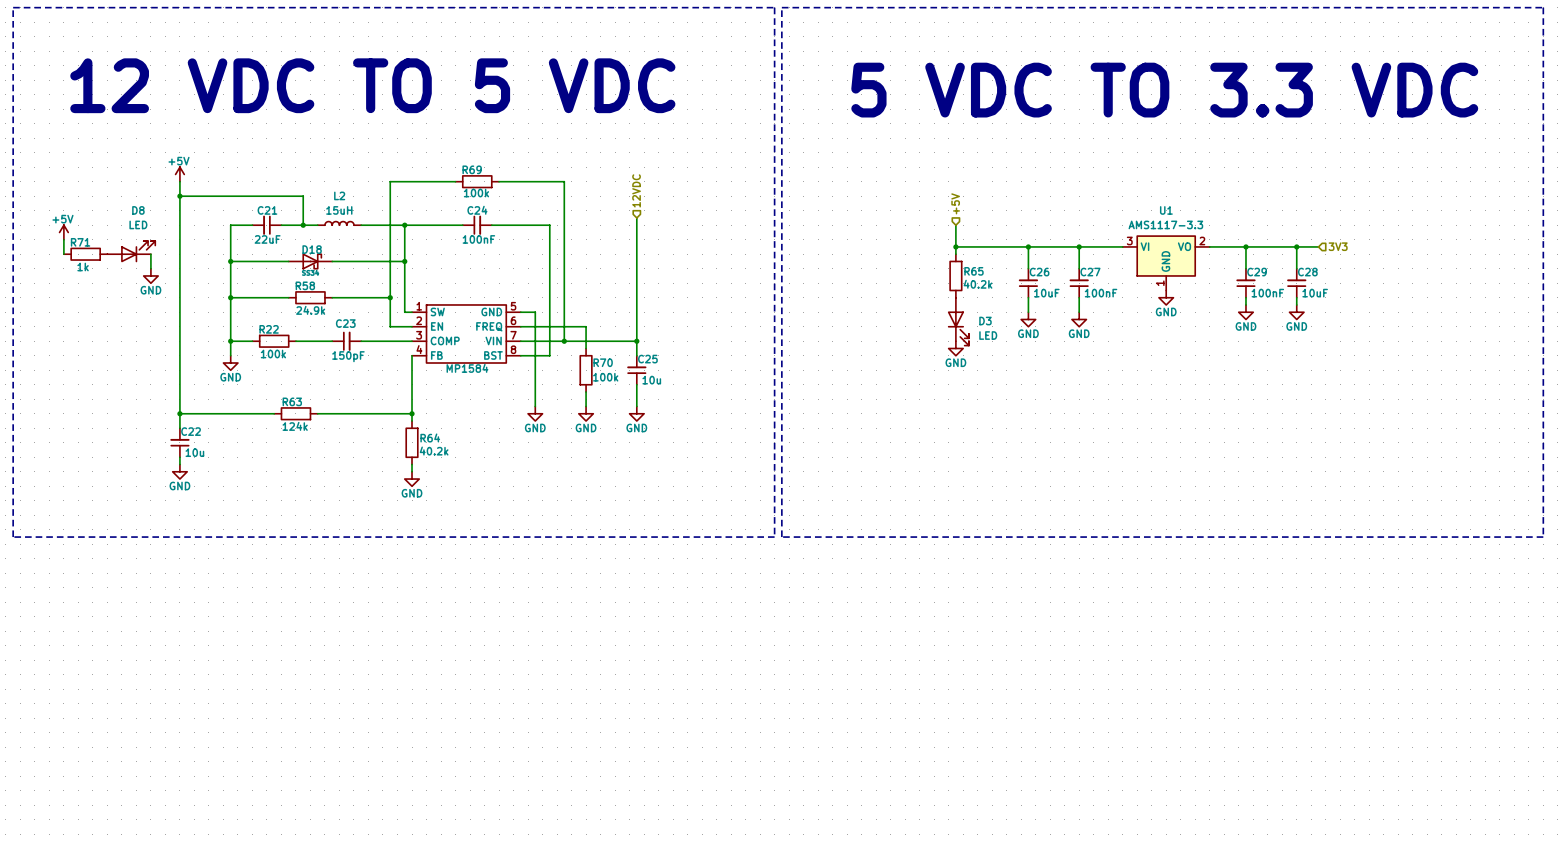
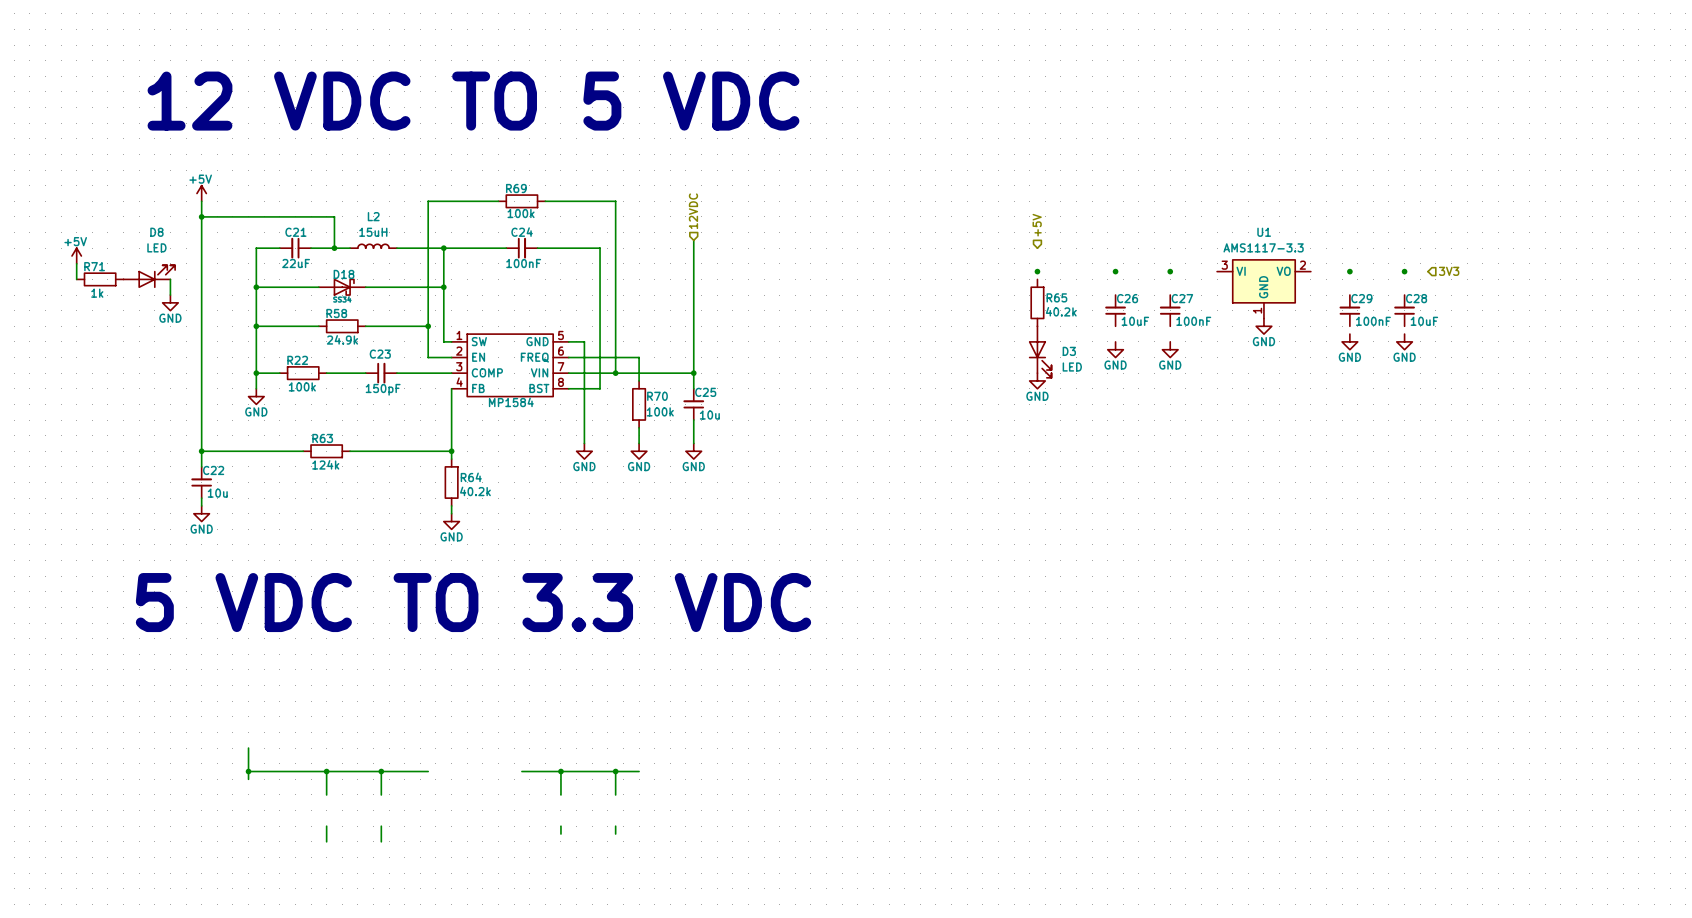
line: (13, 7) (774, 7) (774, 537) (13, 537) (13, 7) -> none
line: (781, 7) (1543, 7) (1543, 537) (781, 537) (781, 7) -> none
text position: 12 VDC TO 5 VDC (372, 85) -> 12 VDC TO 5 VDC (473, 101)
text: 5 VDC TO 3.3 VDC (1164, 90) -> none
wire: (955, 225) (955, 254) -> none
wire: (955, 246) (1122, 246) -> none
wire: (1028, 246) (1028, 268) -> none
wire: (1079, 246) (1079, 268) -> none
wire: (1209, 246) (1318, 246) -> none
wire: (1245, 246) (1245, 268) -> none
wire: (1296, 246) (1296, 268) -> none
wire: (1028, 297) (1028, 312) -> none
wire: (1079, 297) (1079, 312) -> none
wire: (1245, 297) (1245, 304) -> none
wire: (1296, 297) (1296, 304) -> none
text: none -> 5 VDC TO 3.3 VDC (473, 602)
wire: none -> (248, 748) (248, 779)
wire: none -> (248, 771) (428, 771)
junction: none -> (248, 771)
wire: none -> (326, 771) (326, 794)
junction: none -> (326, 771)
wire: none -> (381, 771) (381, 794)
junction: none -> (381, 771)
wire: none -> (521, 771) (639, 771)
wire: none -> (560, 771) (560, 794)
junction: none -> (560, 771)
wire: none -> (615, 771) (615, 794)
junction: none -> (615, 771)
wire: none -> (326, 826) (326, 841)
wire: none -> (381, 826) (381, 841)
wire: none -> (560, 826) (560, 834)
wire: none -> (615, 826) (615, 834)

